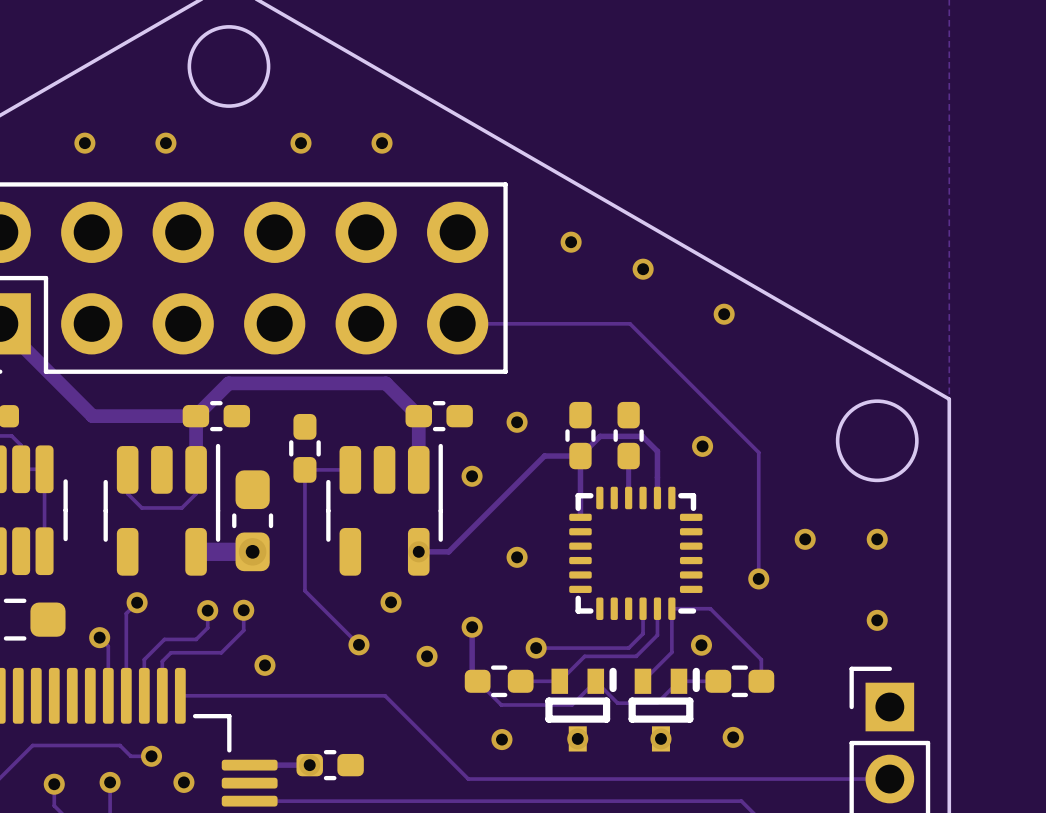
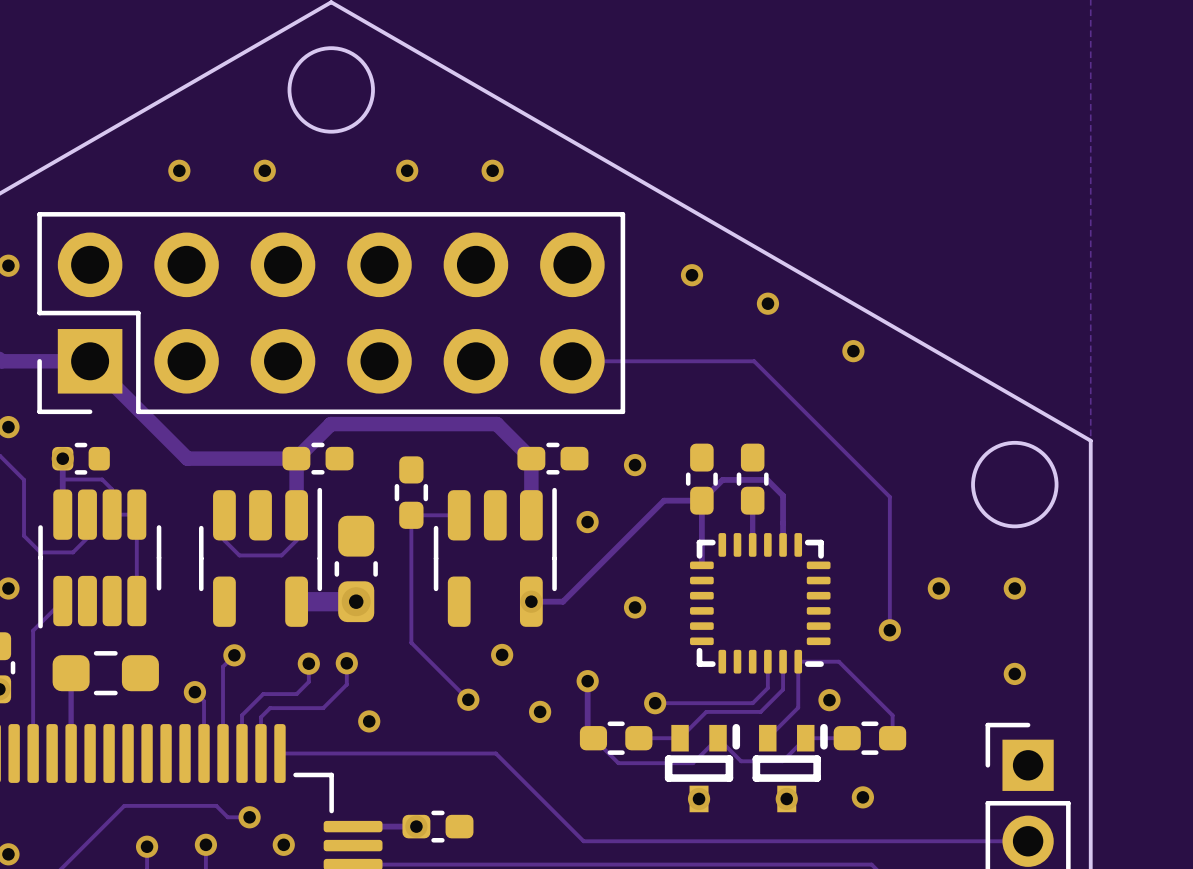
via: (702, 446) -> none
via: (501, 739) -> none

